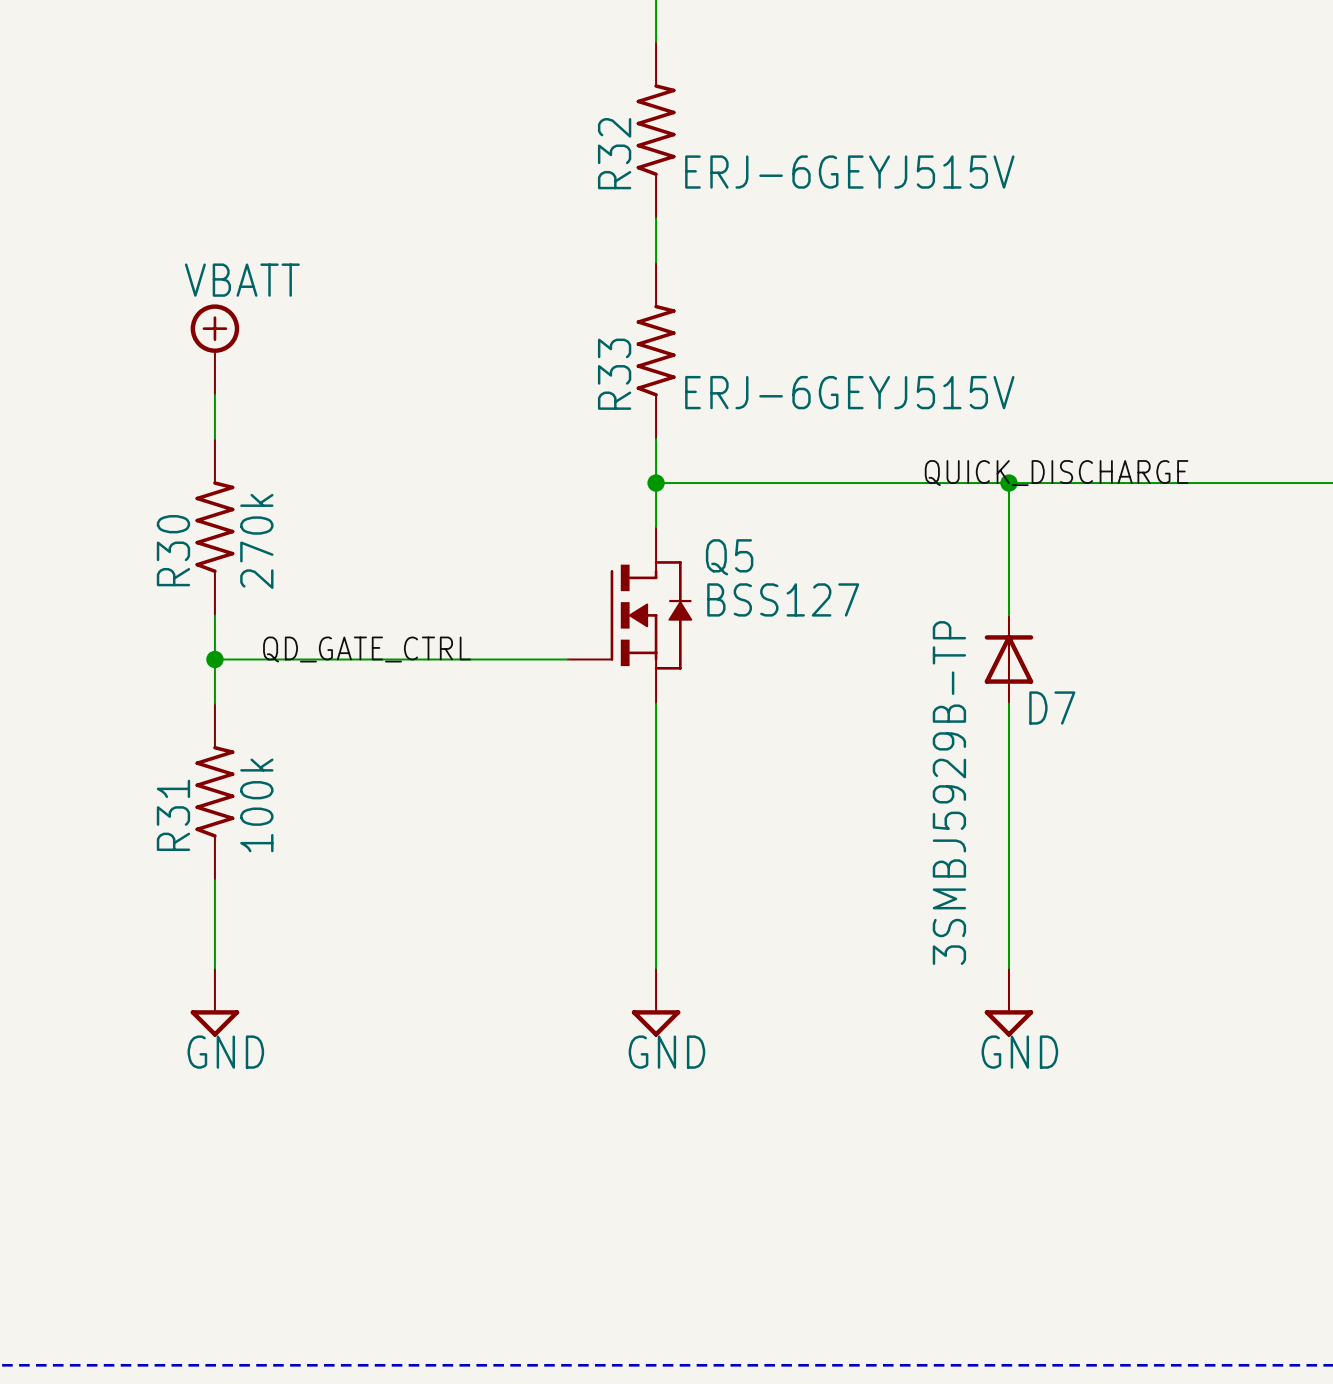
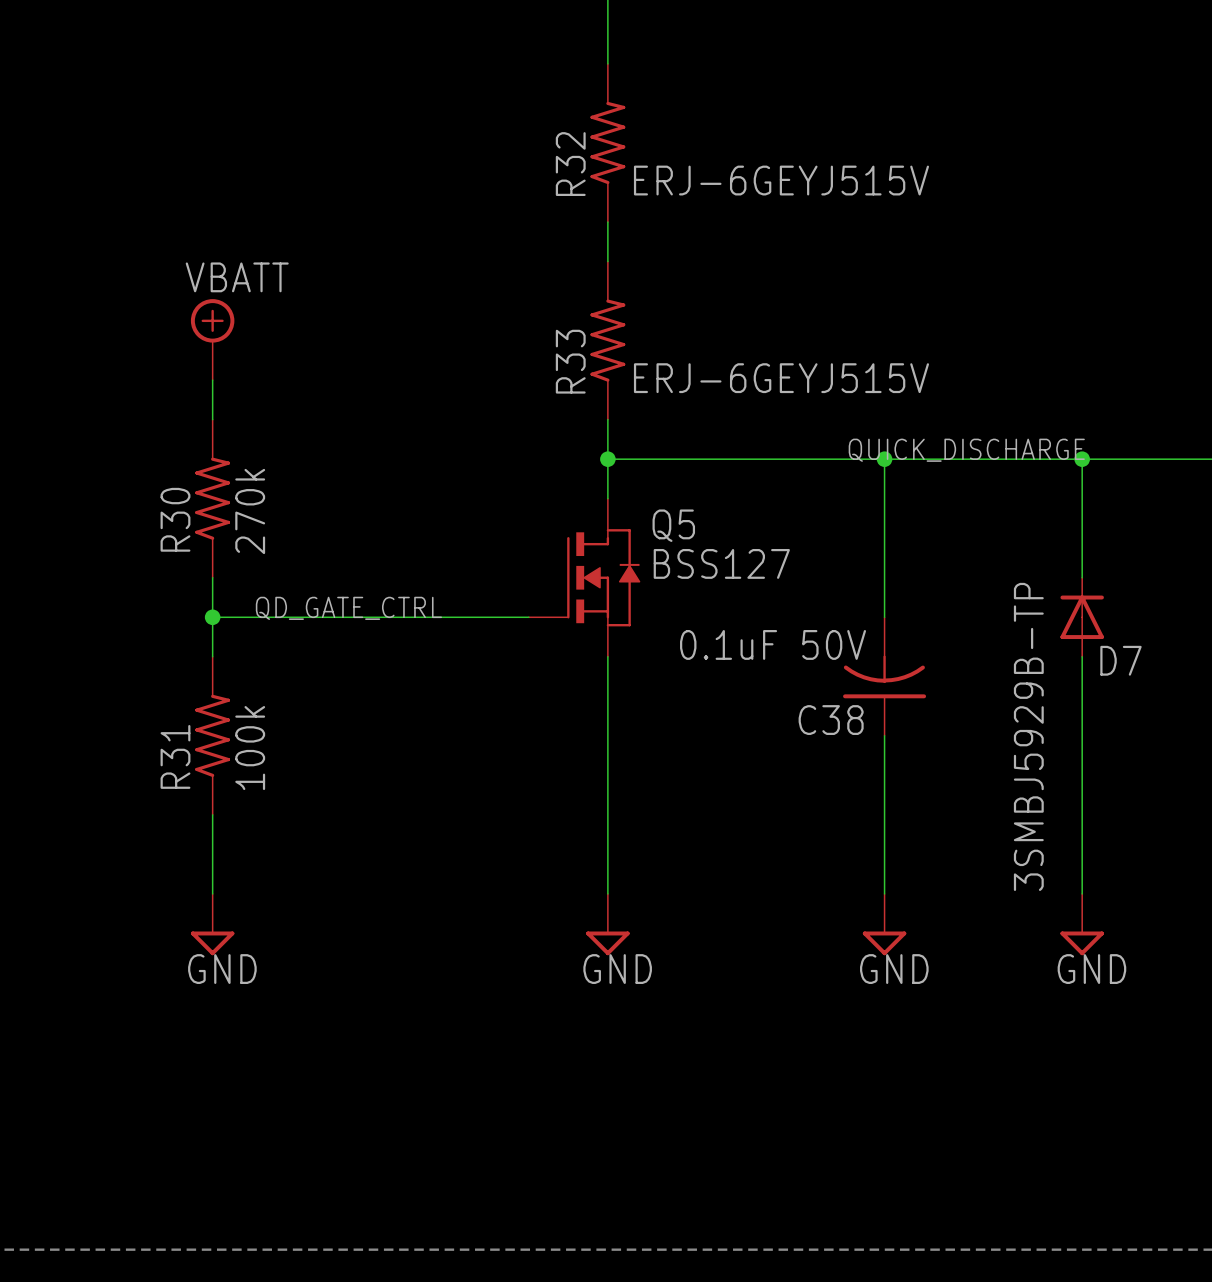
wire: none -> (884, 459) (884, 617)
wire: (1008, 483) (1008, 615) -> (1082, 459) (1082, 577)
junction position: (1008, 483) -> (884, 459)
junction: none -> (1082, 459)
D7 position: (1008, 659) -> (1082, 617)
wire: (1008, 703) (1008, 968) -> (1082, 656) (1082, 893)
C38: none -> 0.1uF 50V (884, 676)
wire: none -> (884, 735) (884, 893)
power symbol position: GND (1008, 1002) -> GND (884, 924)
power symbol: none -> GND (1082, 924)

